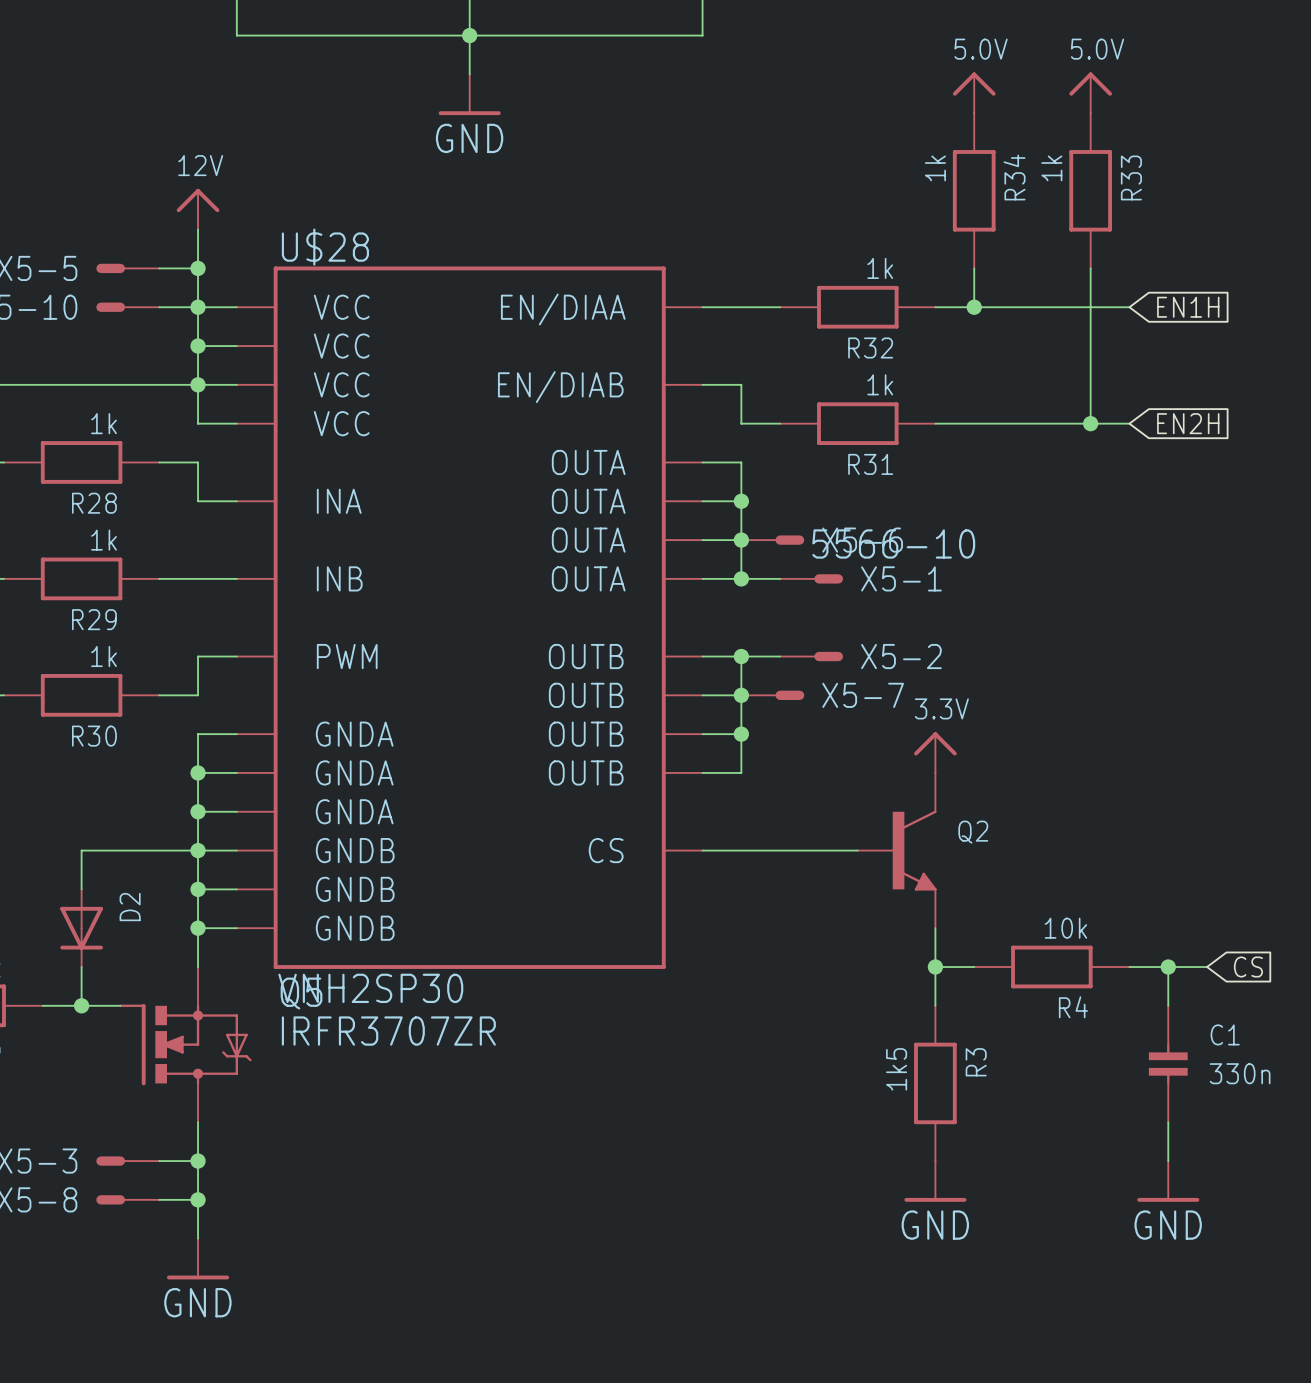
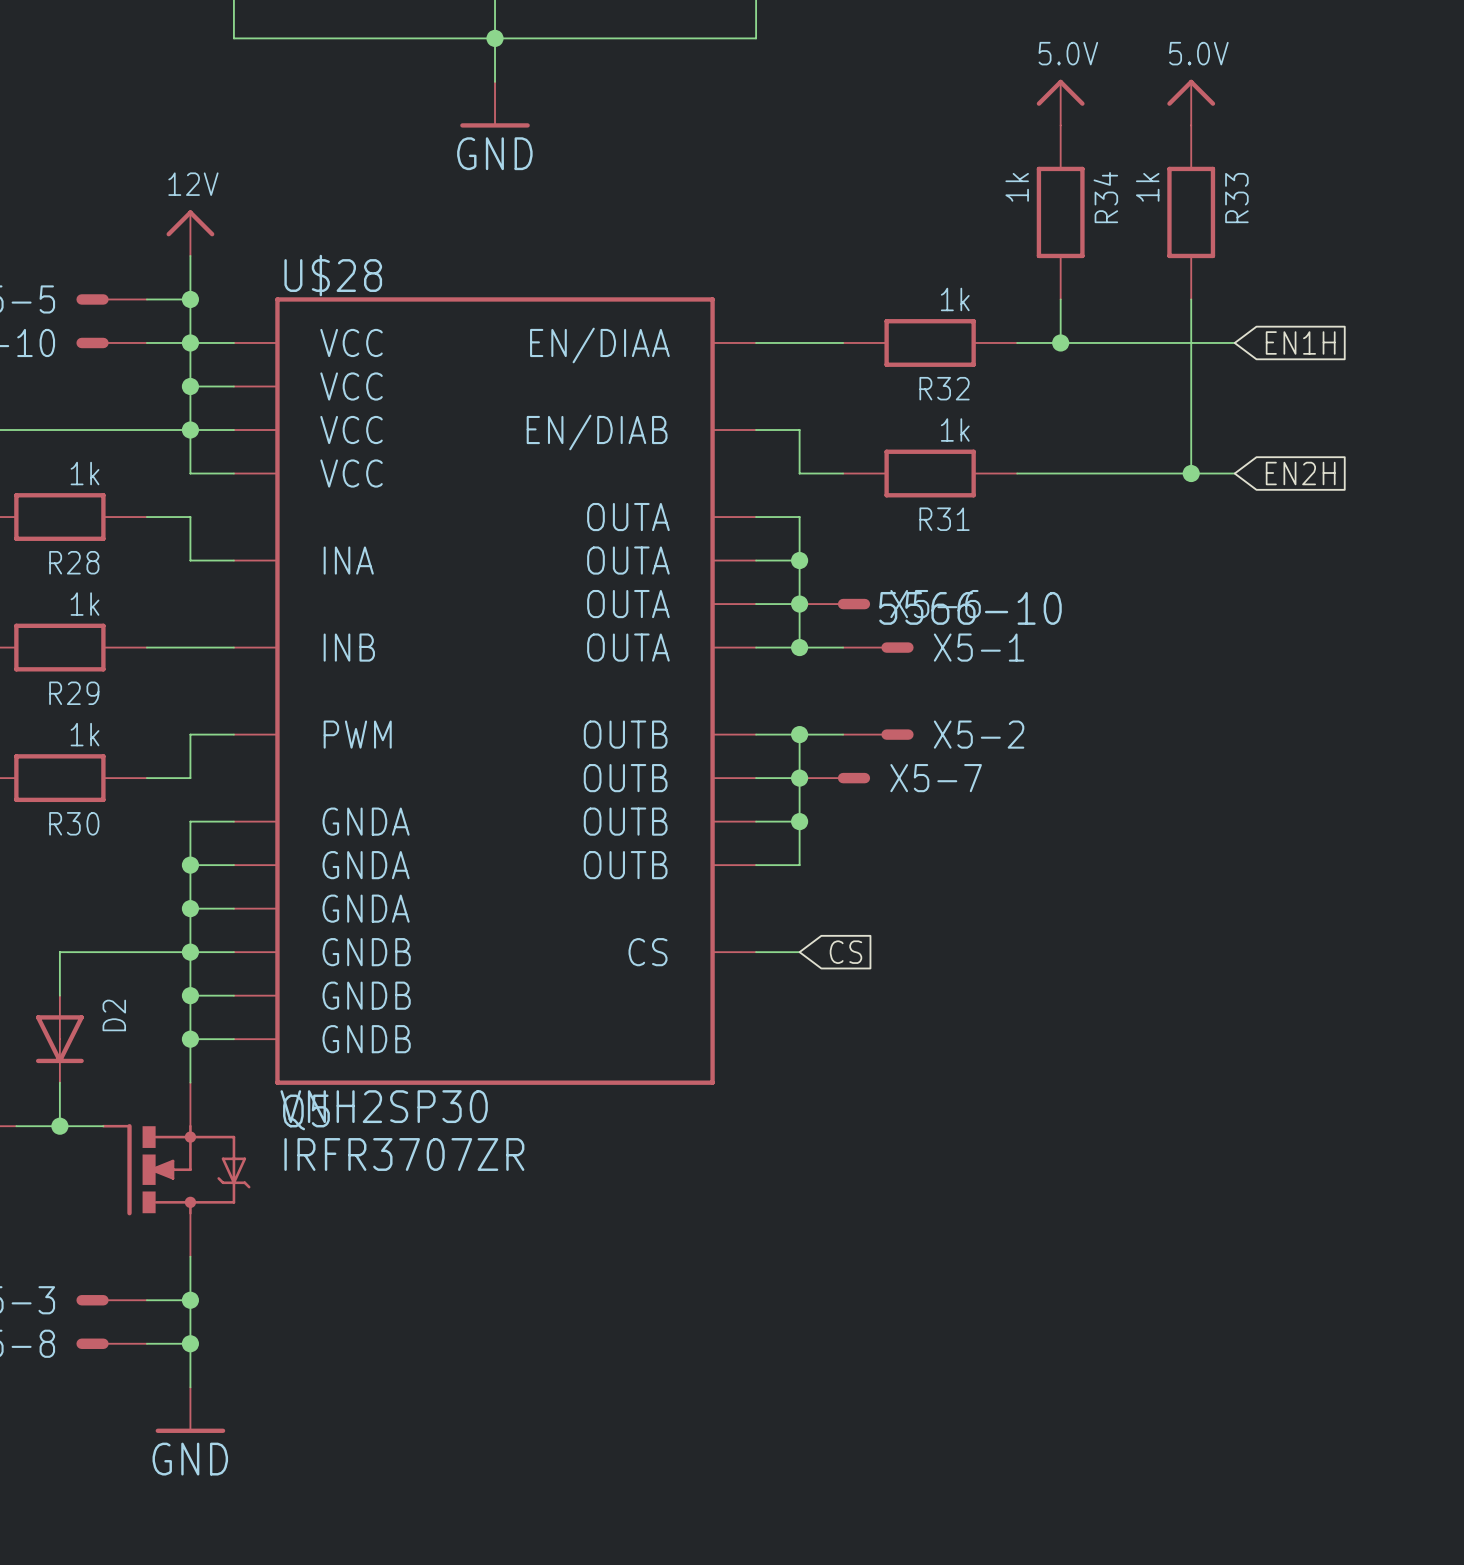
power symbol: 3.3V (935, 752) -> none
wire: (741, 850) (857, 850) -> none
global label: none -> CS (845, 952)
Q2: (897, 850) -> none
wire: (935, 928) (935, 1005) -> none
wire: (935, 967) (974, 967) -> none
junction: (935, 967) -> none
R4: 10k (1051, 967) -> none
wire: (1129, 967) (1207, 967) -> none
wire: (1168, 967) (1168, 1005) -> none
junction: (1168, 967) -> none
global label: CS (1248, 967) -> none
C1: 330n (1168, 1064) -> none
R3: 1k5 (935, 1083) -> none
wire: (1168, 1122) (1168, 1161) -> none
power symbol: GND (935, 1181) -> none
power symbol: GND (1168, 1181) -> none

